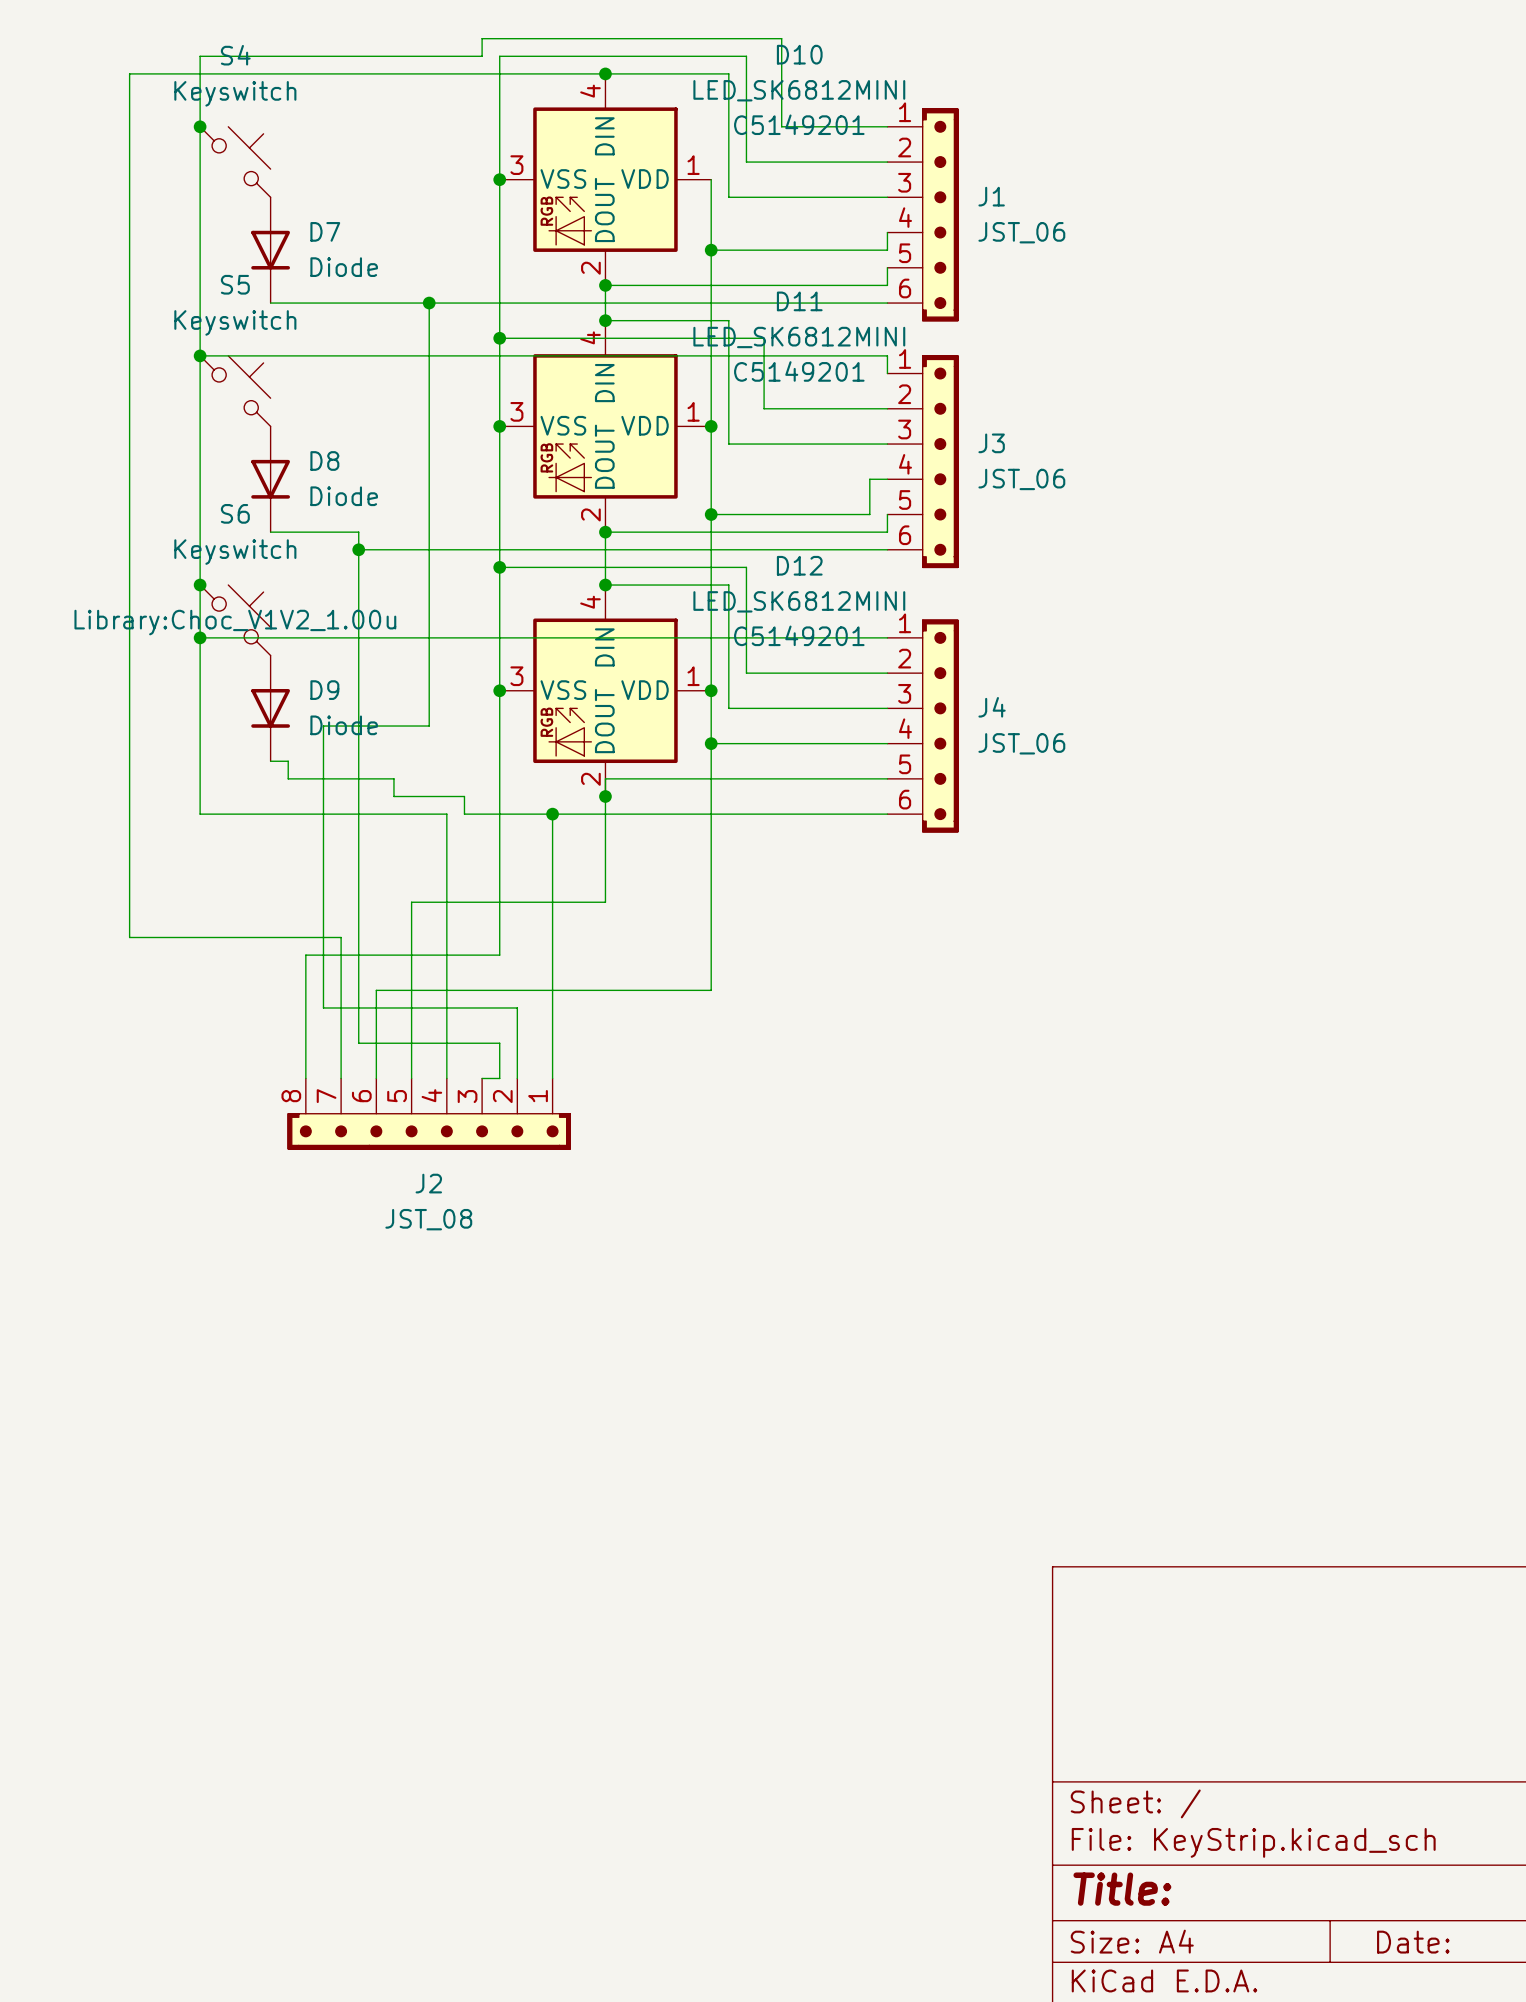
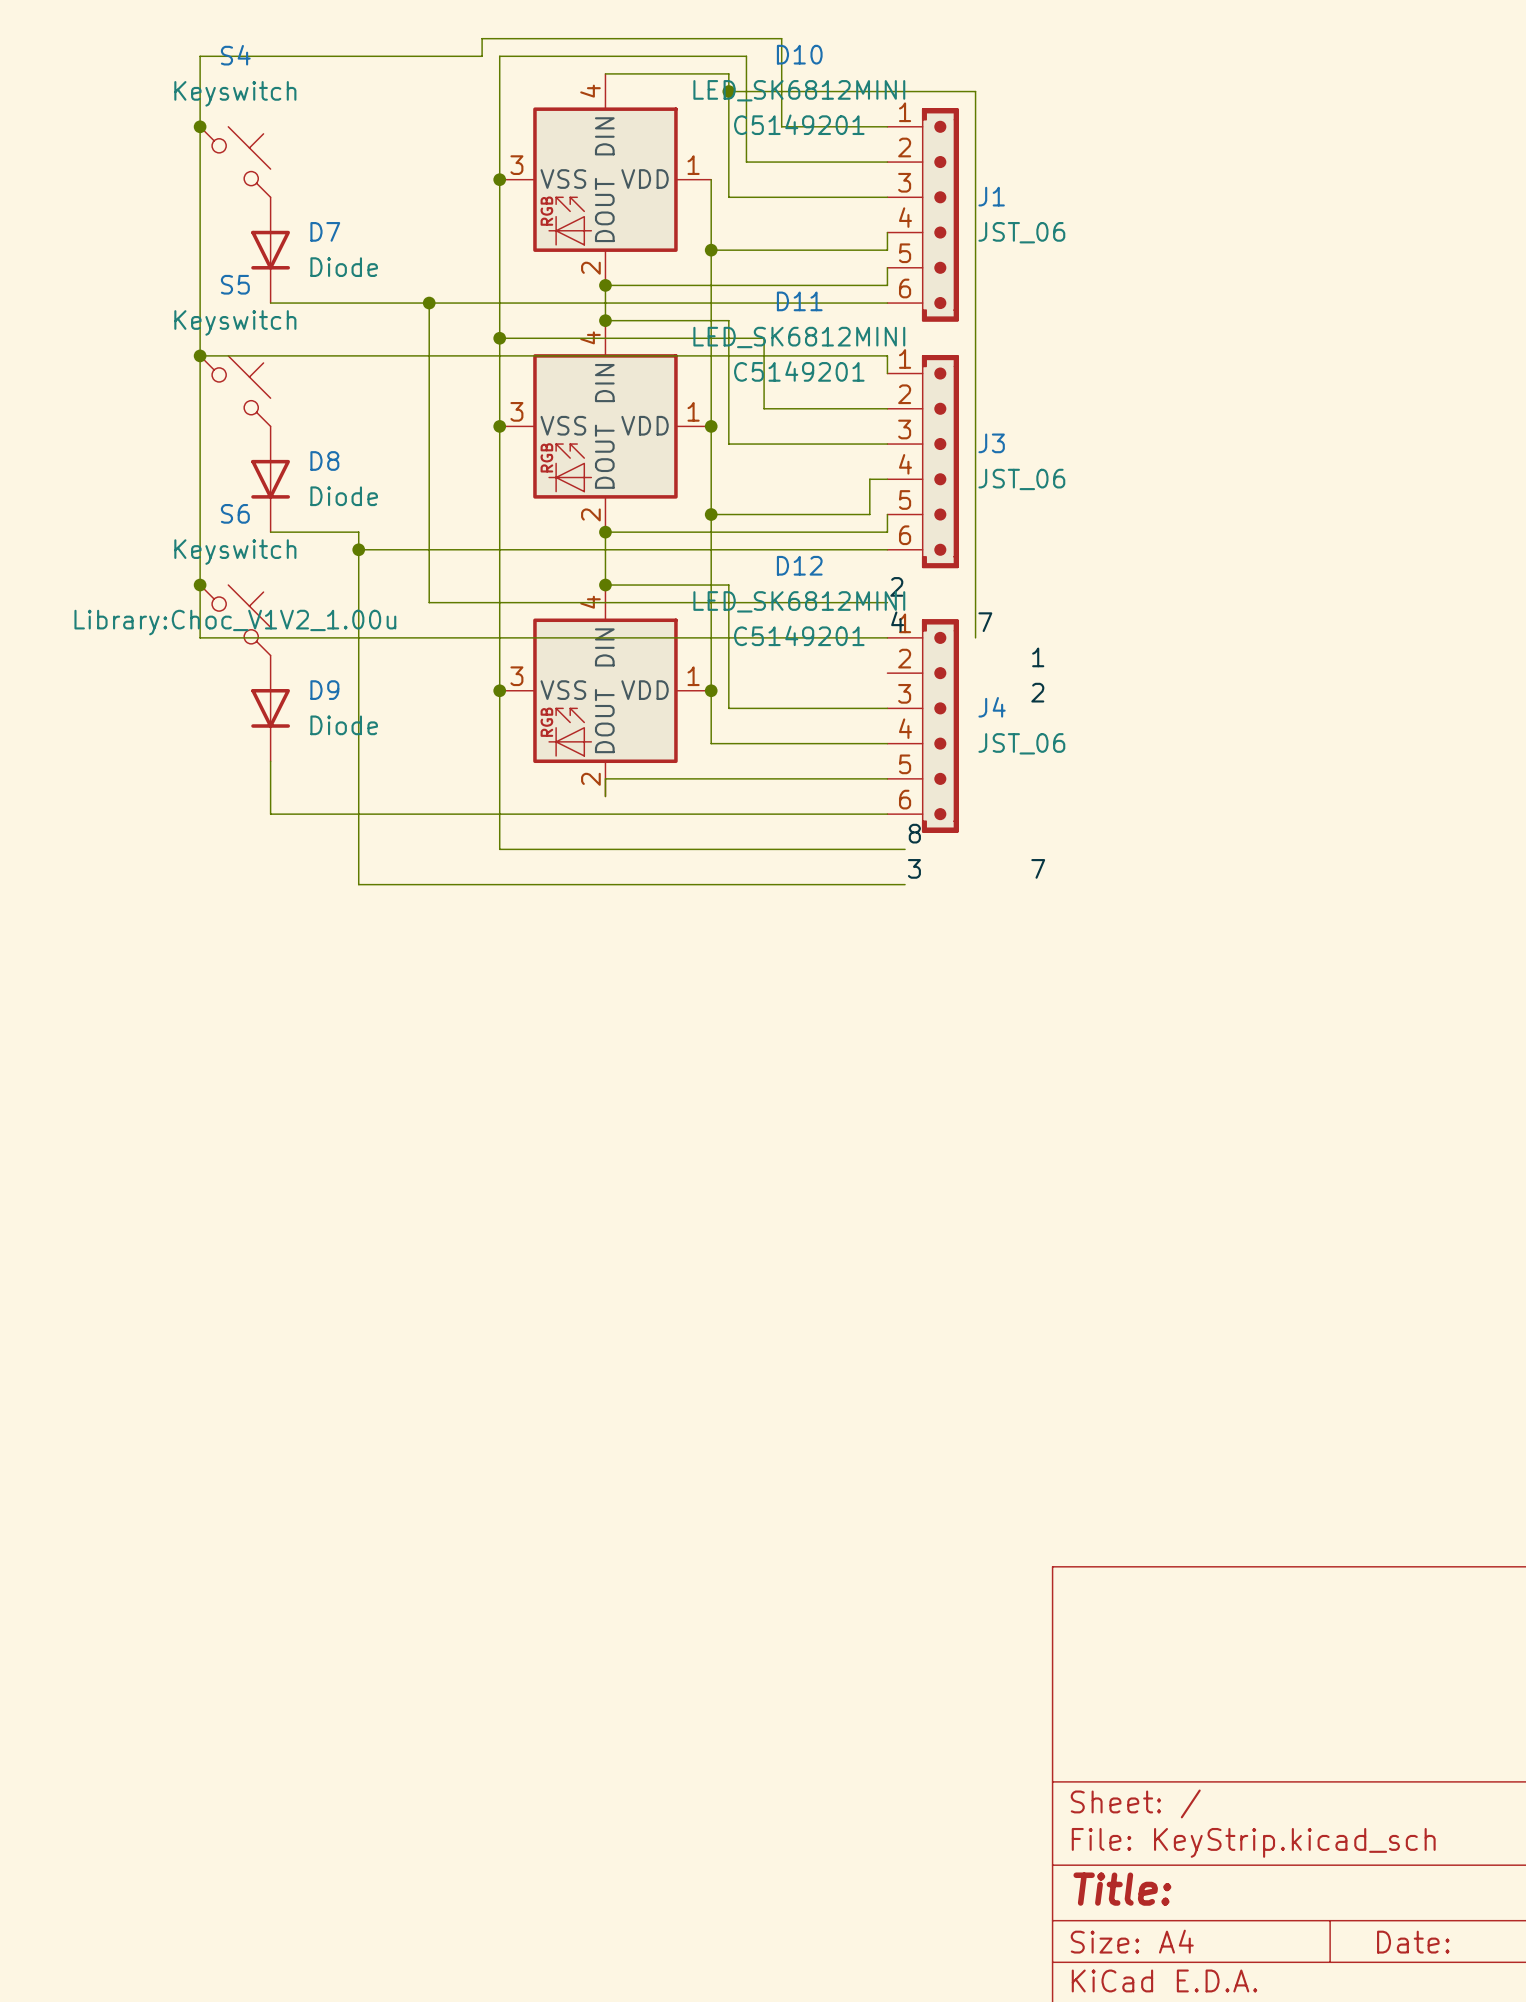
wire: (605, 73) (129, 73) (129, 937) (341, 937) (341, 1078) -> none
junction: (605, 73) -> none
wire: none -> (728, 91) (975, 91) (975, 637)
junction: none -> (728, 91)
wire: (499, 567) (746, 567) (746, 673) (887, 673) -> none
junction: (499, 567) -> none
label: none -> 2 (896, 586)
wire: (429, 602) (429, 726) (323, 726) (323, 1007) (517, 1007) (517, 1078) -> (429, 602) (887, 602)
label: none -> 4 (897, 621)
label: none -> 7 (985, 622)
wire: (200, 637) (200, 814) (270, 814) -> (270, 761) (270, 814)
junction: (200, 637) -> none
label: none -> 1 (1038, 657)
label: none -> 2 (1037, 692)
wire: (711, 743) (711, 990) (376, 990) (376, 1078) -> none
junction: (711, 743) -> none
wire: (270, 761) (288, 761) (288, 778) (393, 778) (393, 796) (464, 796) (464, 814) -> (446, 814) (464, 814)
wire: (605, 796) (605, 902) (411, 902) (411, 1078) -> none
junction: (605, 796) -> none
wire: (446, 814) (446, 1078) -> none
wire: (552, 814) (552, 1078) -> none
junction: (552, 814) -> none
label: none -> 8 (914, 833)
wire: (499, 849) (499, 955) (305, 955) (305, 1078) -> (499, 849) (905, 849)
label: none -> 3 (914, 868)
label: none -> 7 (1038, 868)
wire: (358, 884) (358, 1043) (499, 1043) (499, 1078) (482, 1078) -> (358, 884) (905, 884)
J2: JST_08 (429, 1113) -> none

